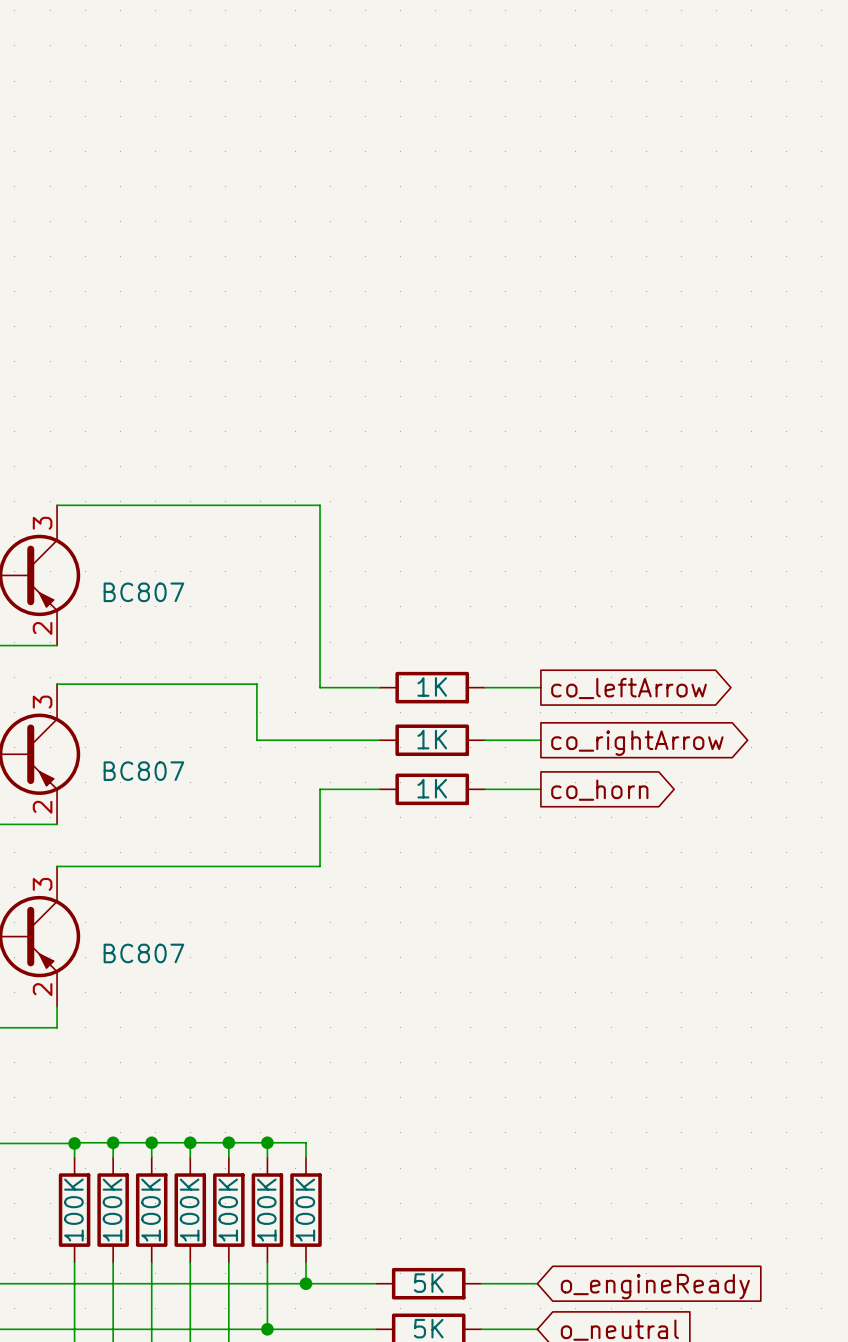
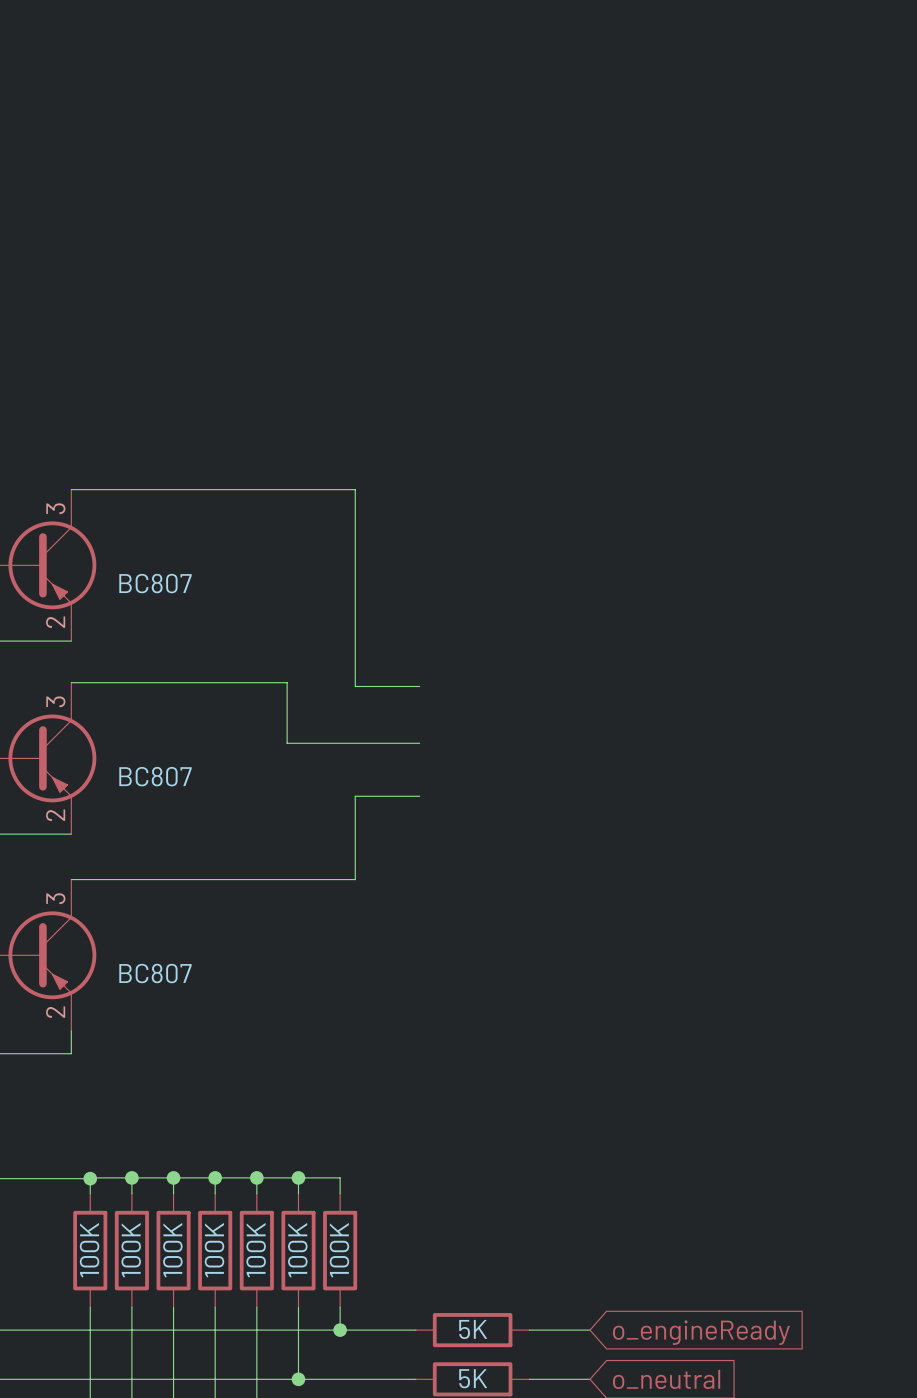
part: 1K (432, 687) -> none
wire: (484, 687) (540, 687) -> none
global label: co_leftArrow (629, 688) -> none
part: 1K (432, 740) -> none
wire: (484, 740) (540, 740) -> none
global label: co_rightArrow (637, 743) -> none
part: 1K (432, 789) -> none
wire: (484, 789) (540, 789) -> none
global label: co_horn (599, 790) -> none

